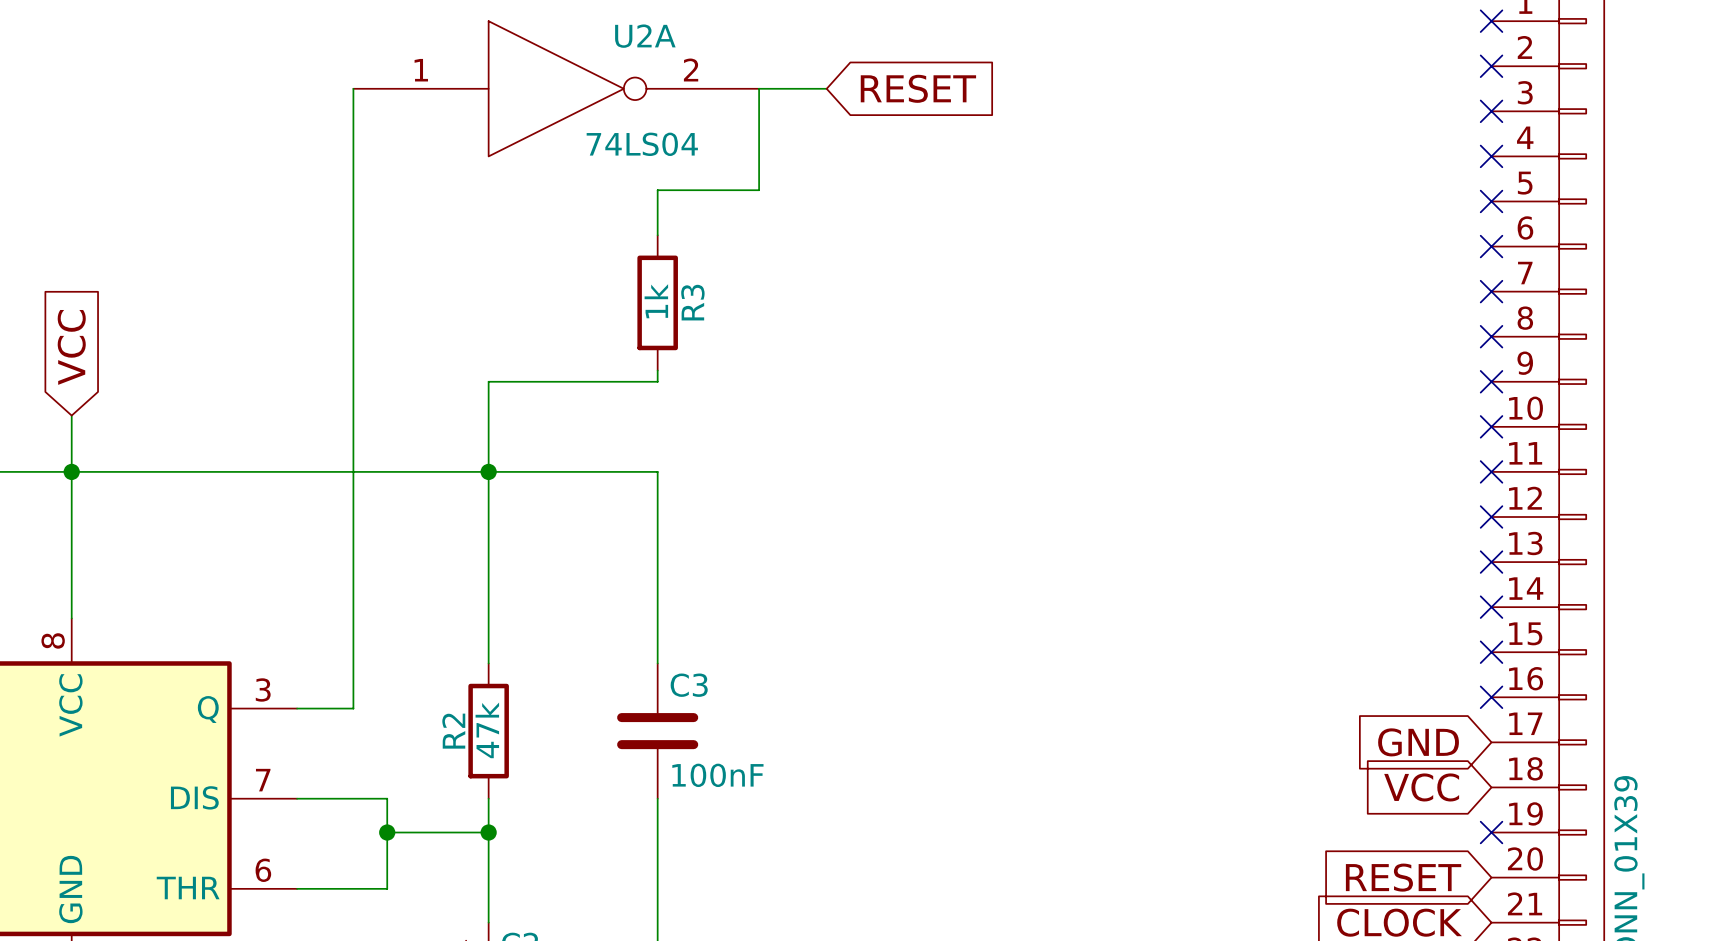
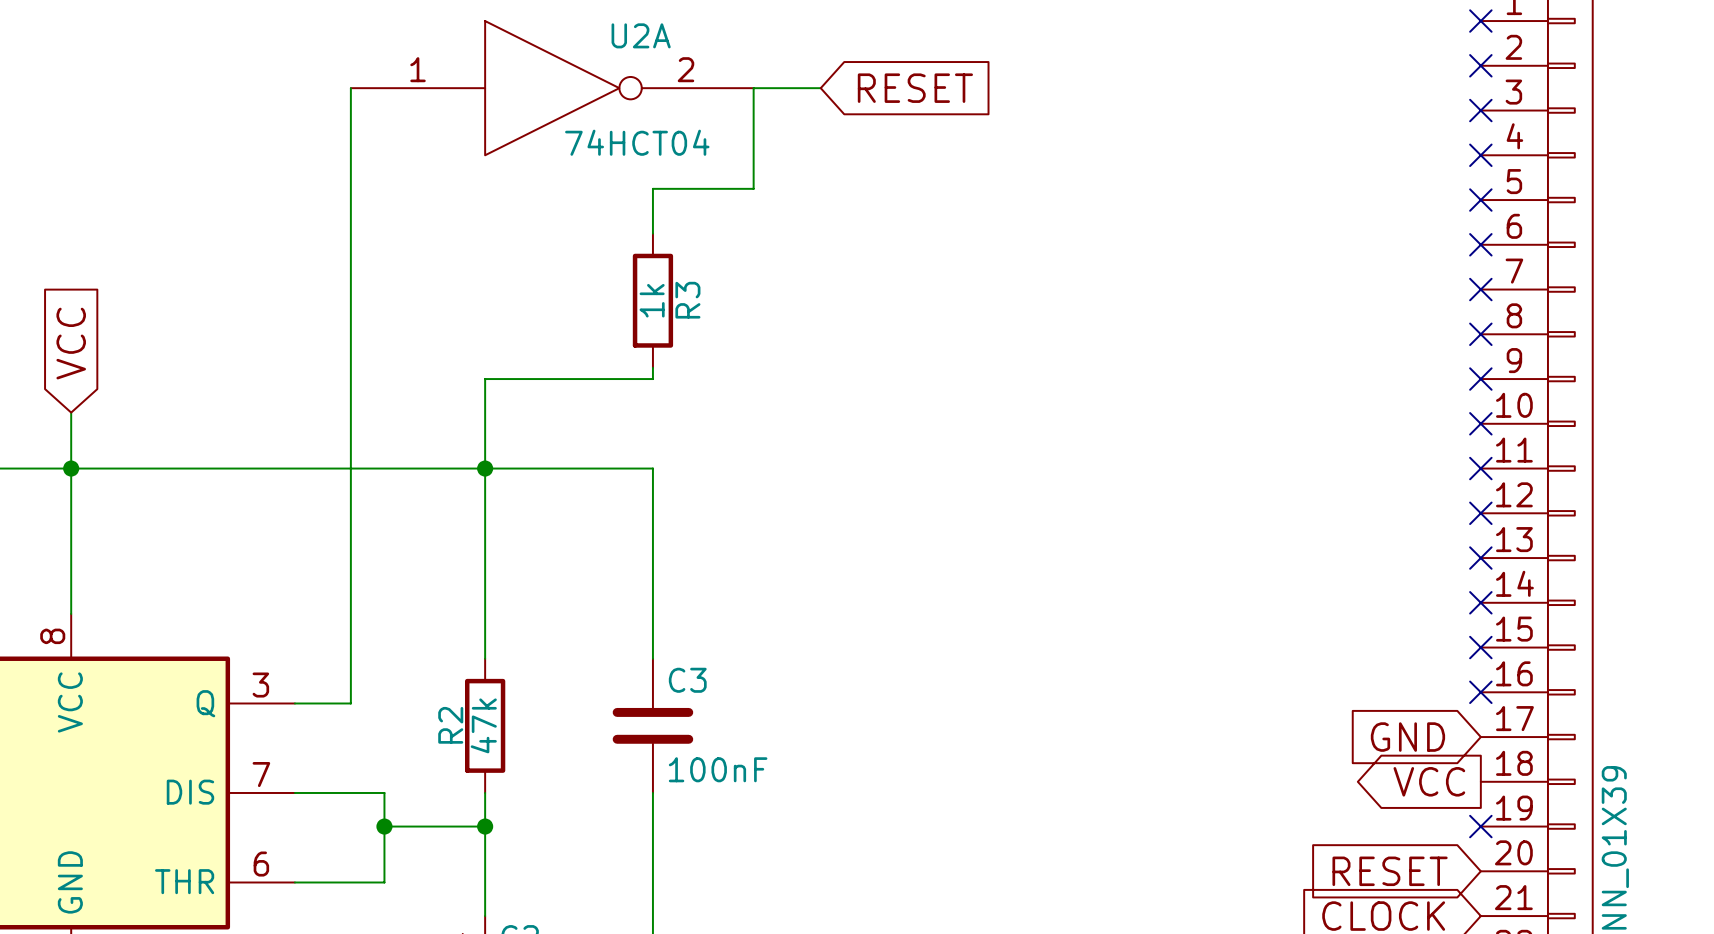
U2A value: 74LS04 (642, 144) -> 74HCT04 (637, 142)
global label shape: input (1421, 787) -> output (1429, 781)

